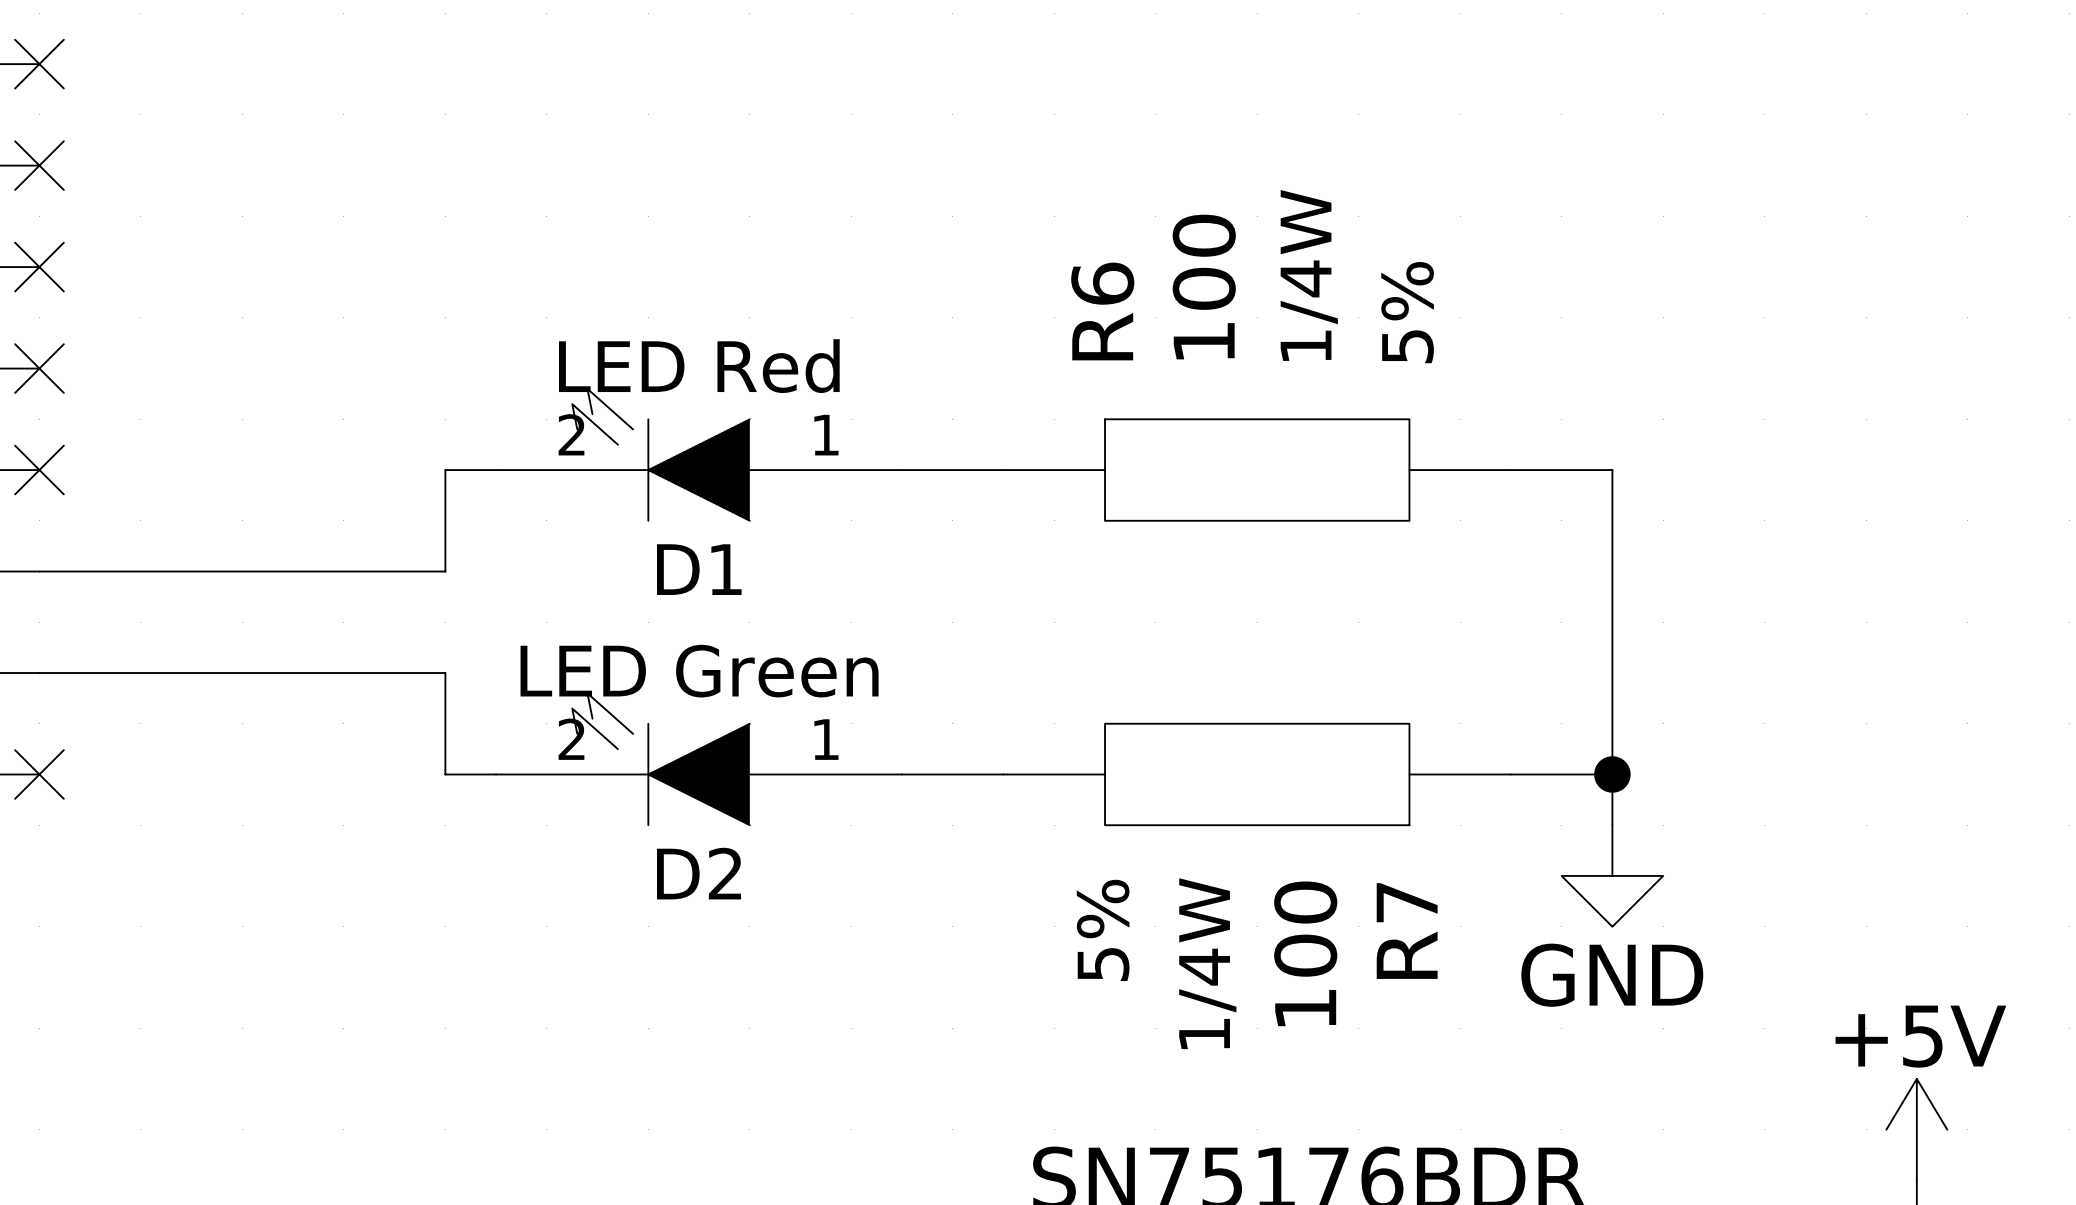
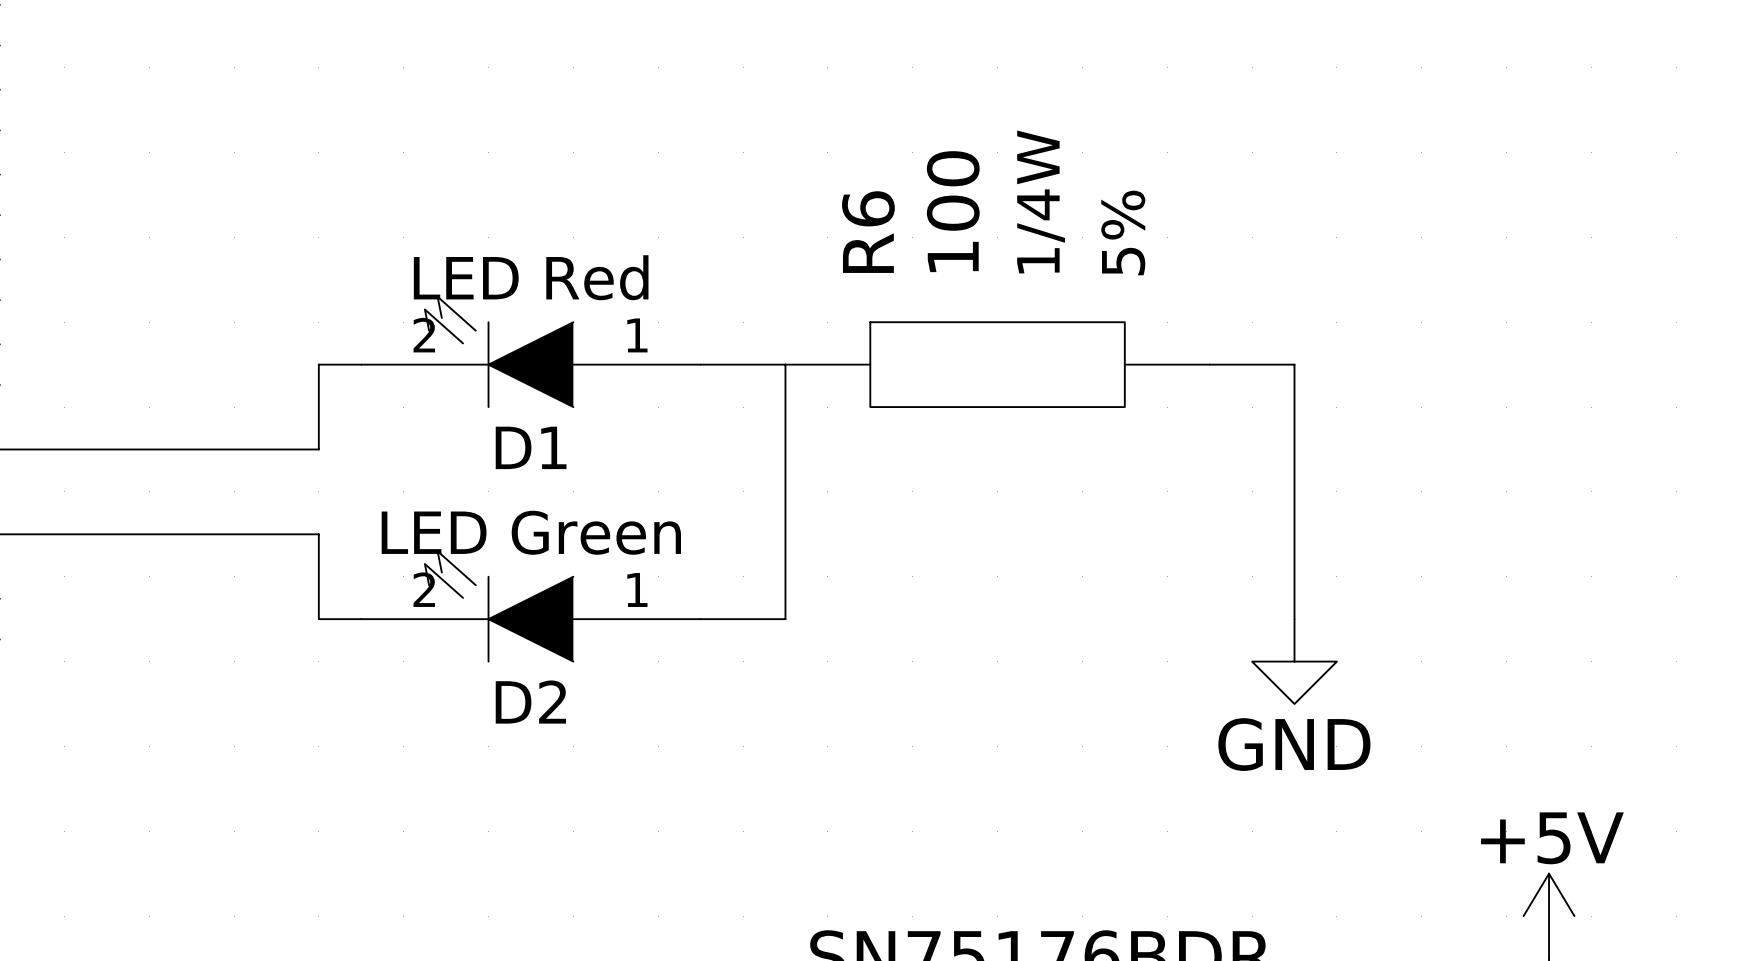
wire: none -> (785, 364) (785, 619)
R7: 100 (1257, 774) -> none
wire: (1510, 774) (1612, 774) (1612, 825) -> none
junction: (1612, 774) -> none
power symbol position: GND (1612, 875) -> GND (1294, 661)

